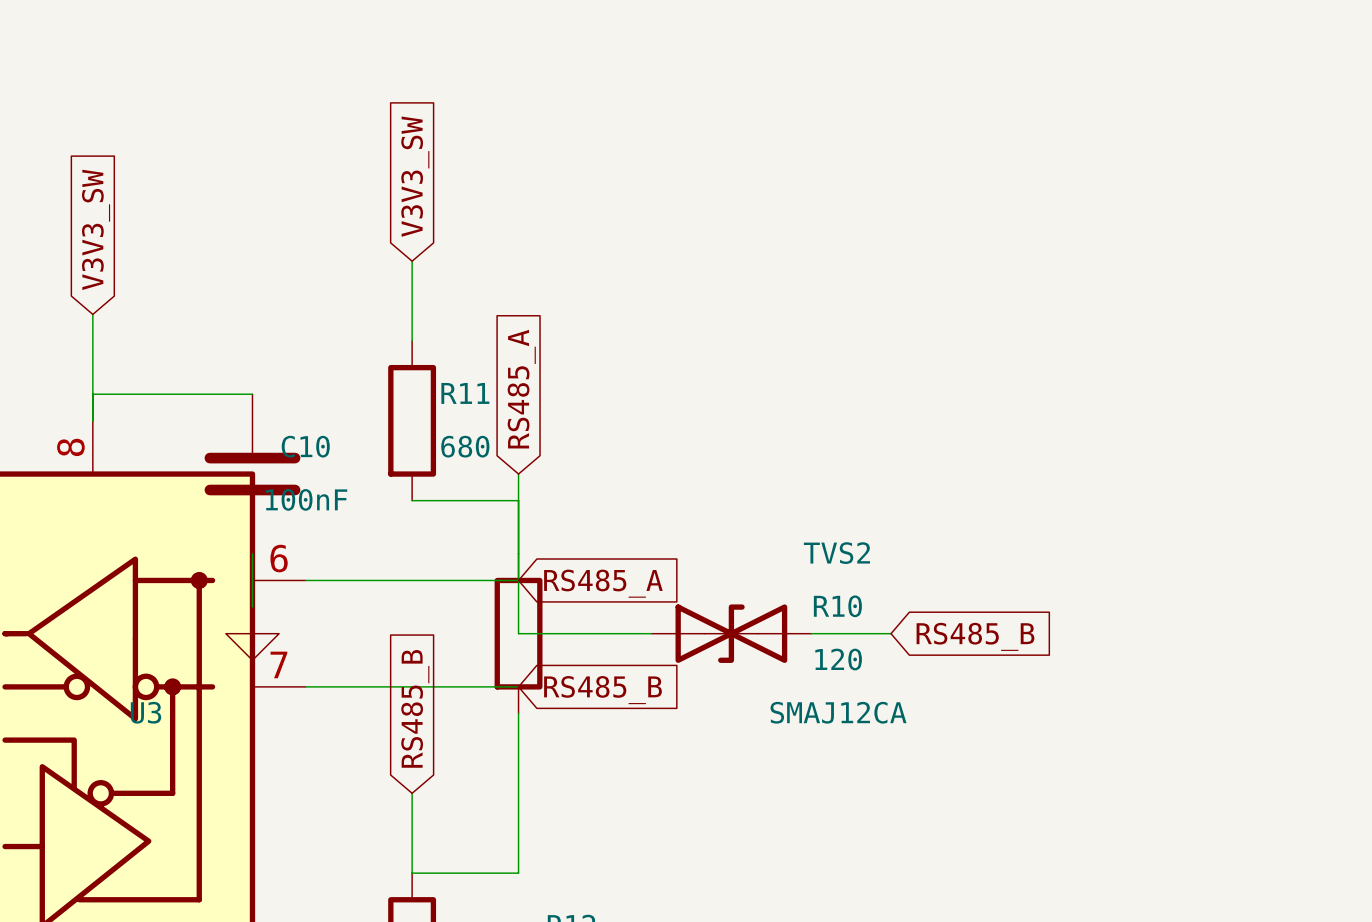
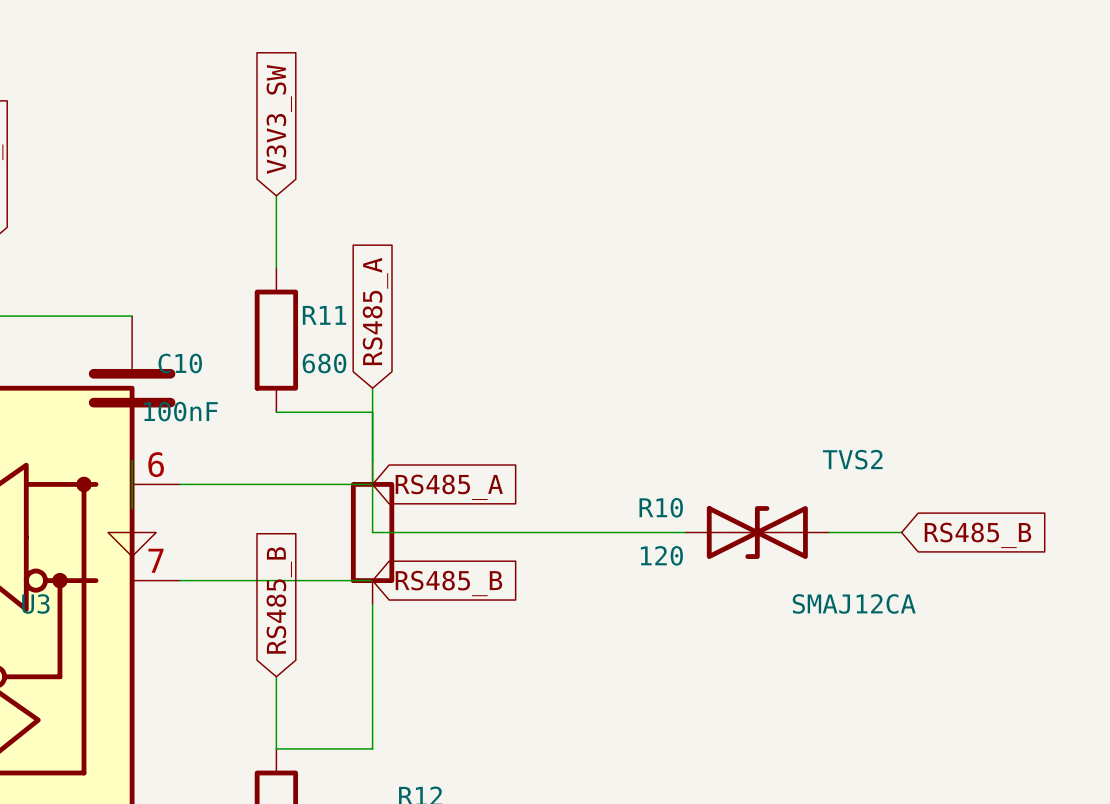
TVS2 position: (731, 633) -> (757, 532)
wire: none -> (829, 532) (901, 532)
global label position: RS485_B (975, 636) -> RS485_B (977, 535)

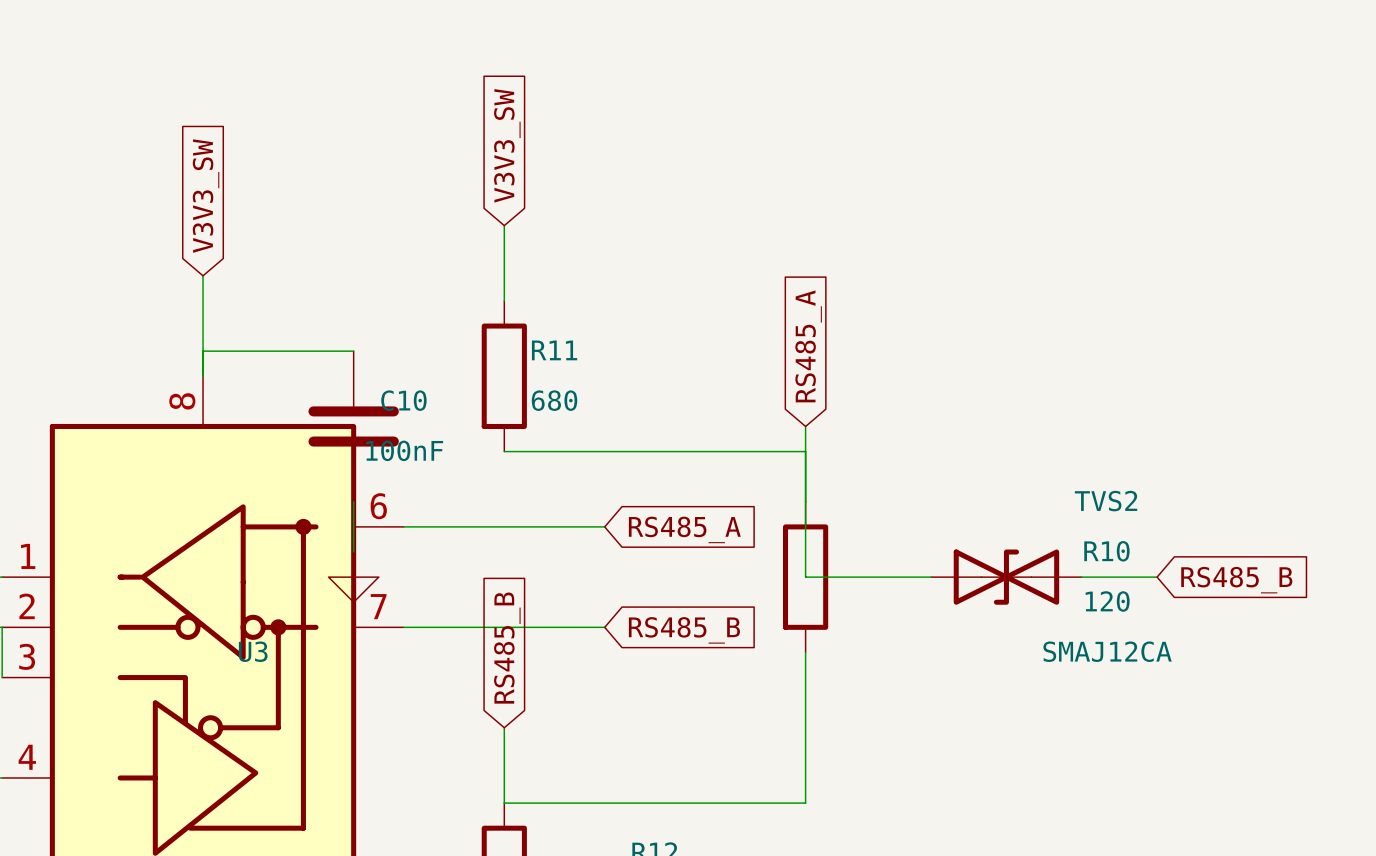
global label position: RS485_A (375, 311) -> RS485_A (808, 346)
wire: (372, 388) (372, 532) (564, 532) -> (805, 426) (805, 577)
wire: none -> (604, 451) (805, 451)
R10 position: (372, 532) -> (805, 577)
wire: (372, 604) (372, 748) -> (805, 652) (805, 803) (604, 803)

